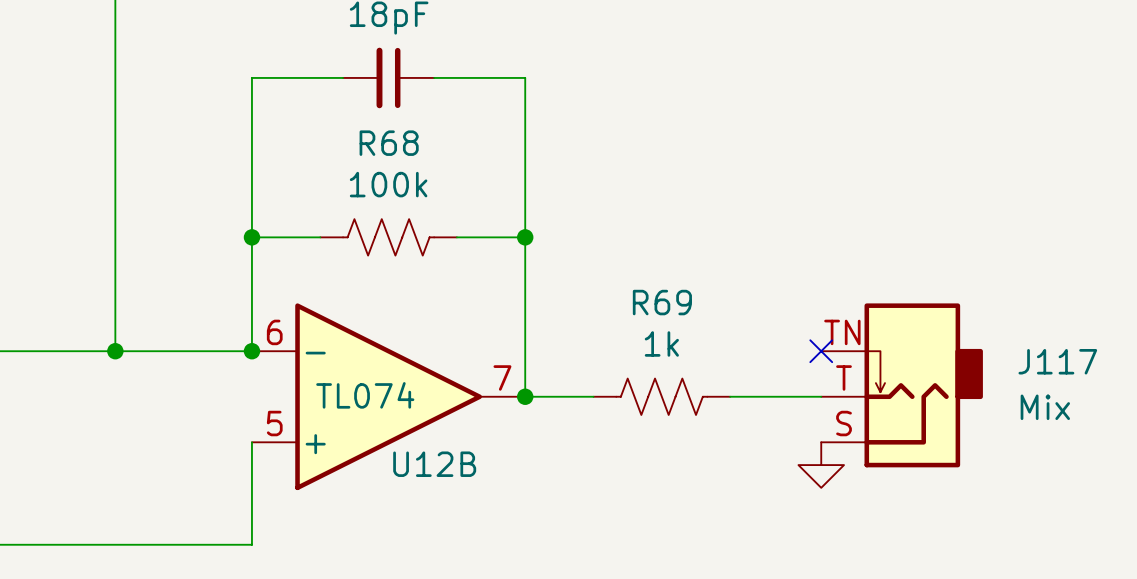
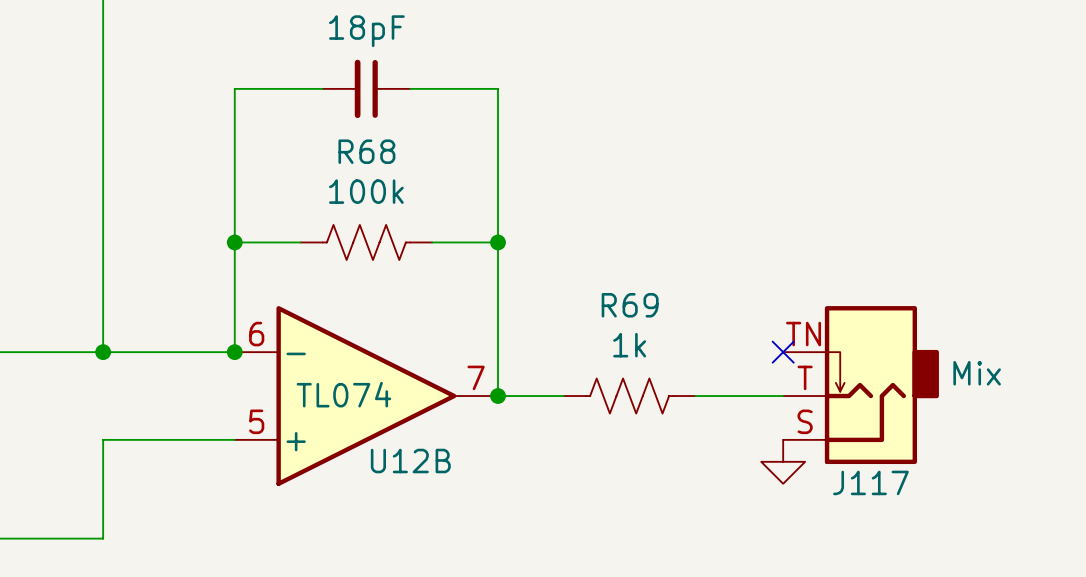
J117 name position: J117 (1057, 361) -> J117 (870, 482)
J117 value position: Mix (1045, 407) -> Mix (977, 373)
wire: (251, 442) (251, 544) (115, 544) -> (234, 439) (103, 439) (103, 538)

